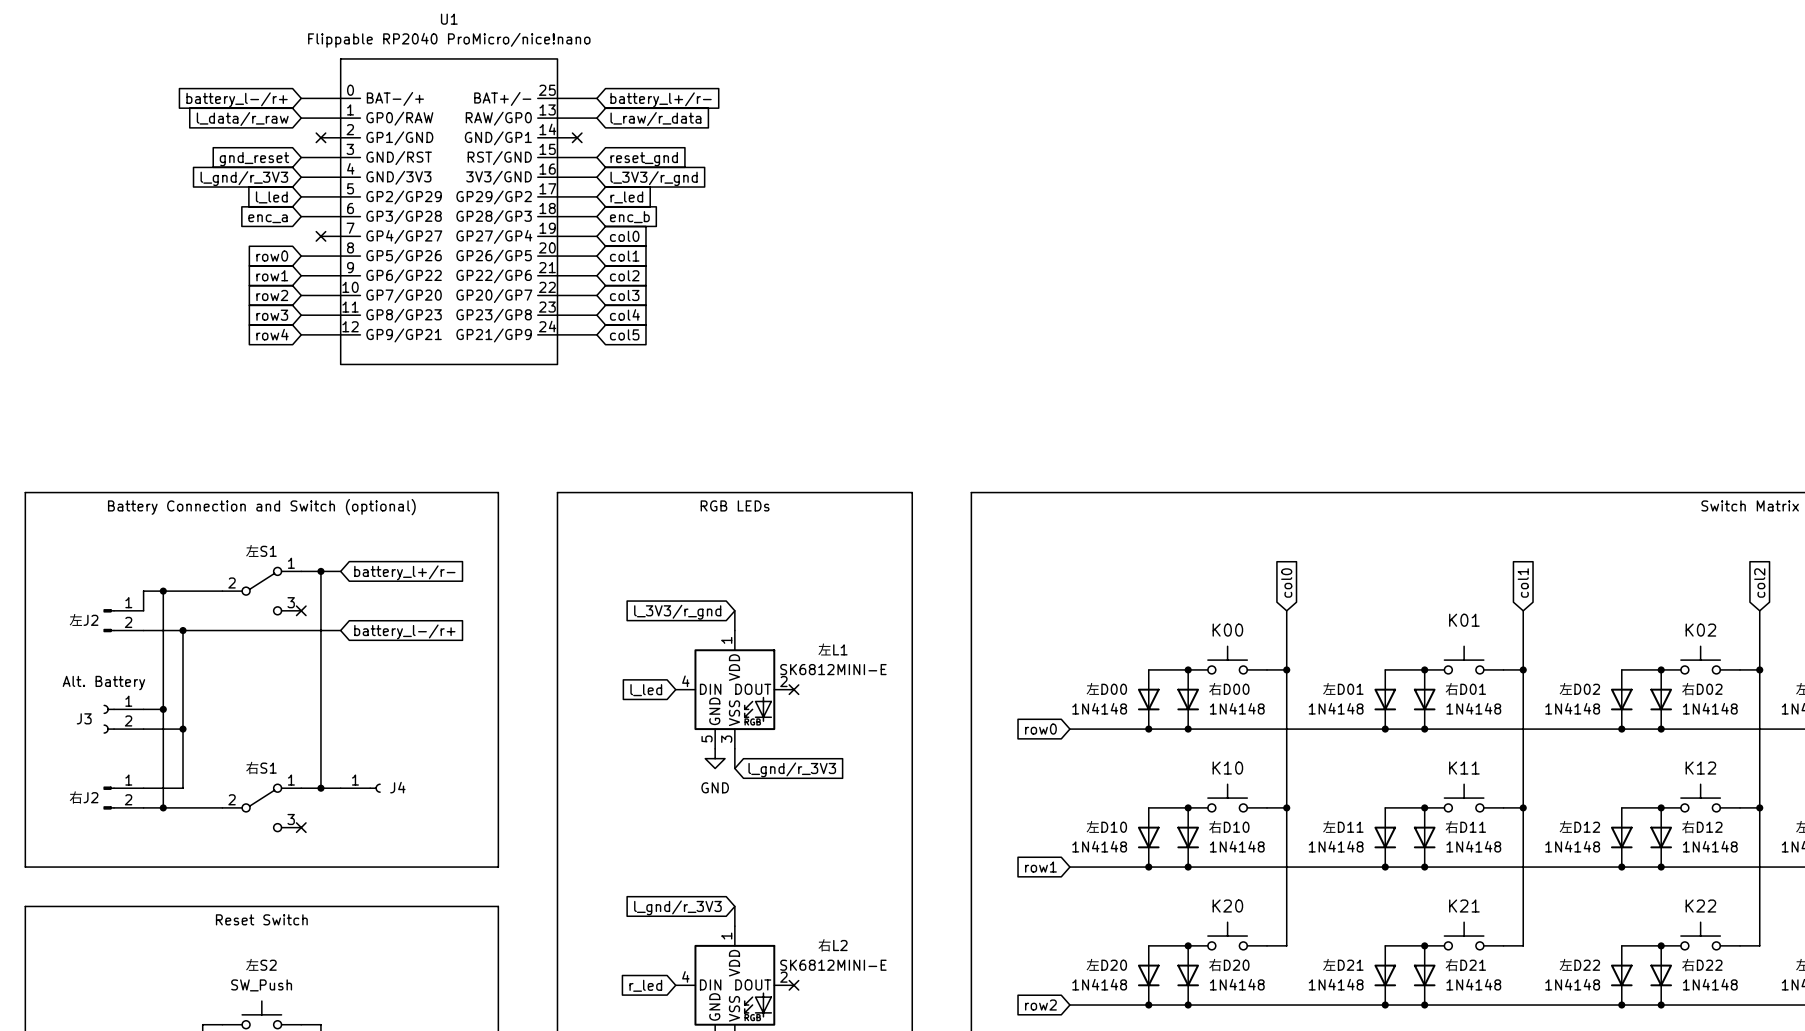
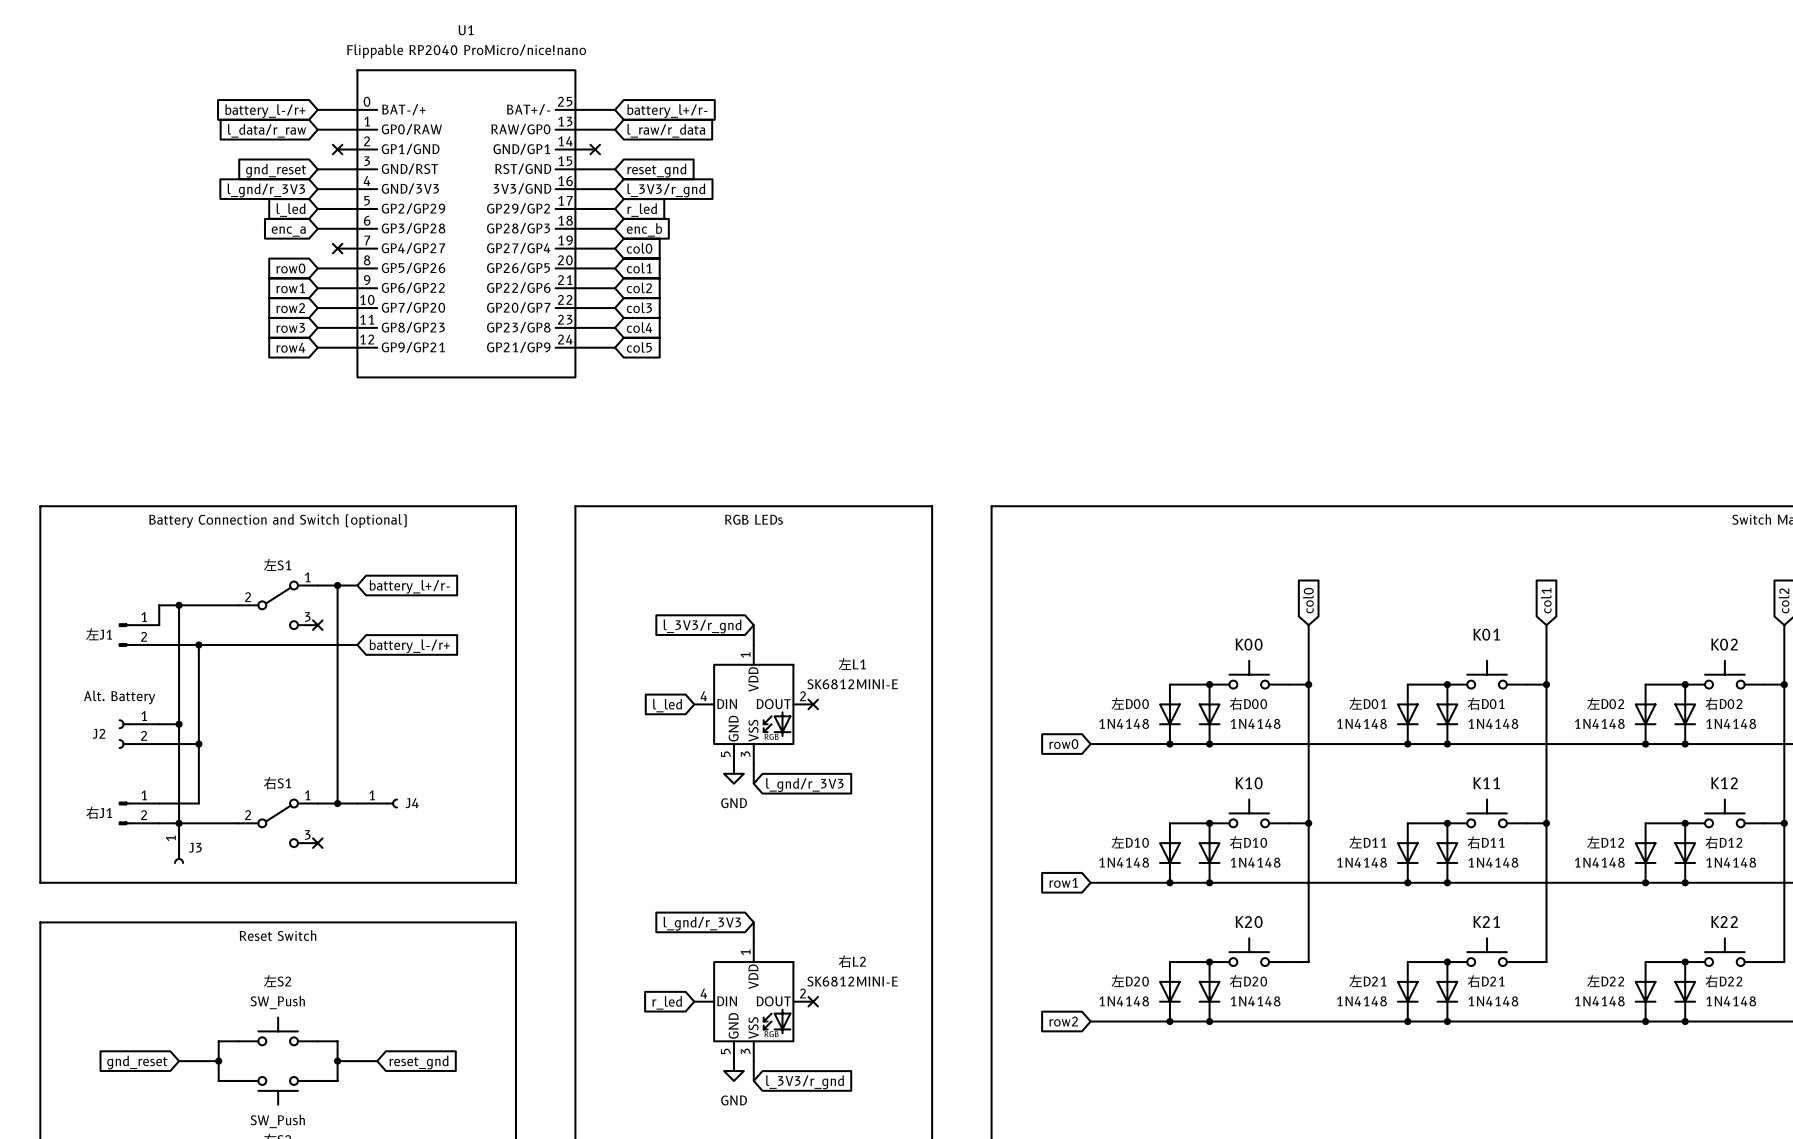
左J2 name: 左J2 (83, 619) -> 左J1 (99, 634)
J3 name: J3 (84, 718) -> J2 (98, 733)
右J2 name: 右J2 (83, 797) -> 右J1 (99, 812)
J3: none -> (179, 843)

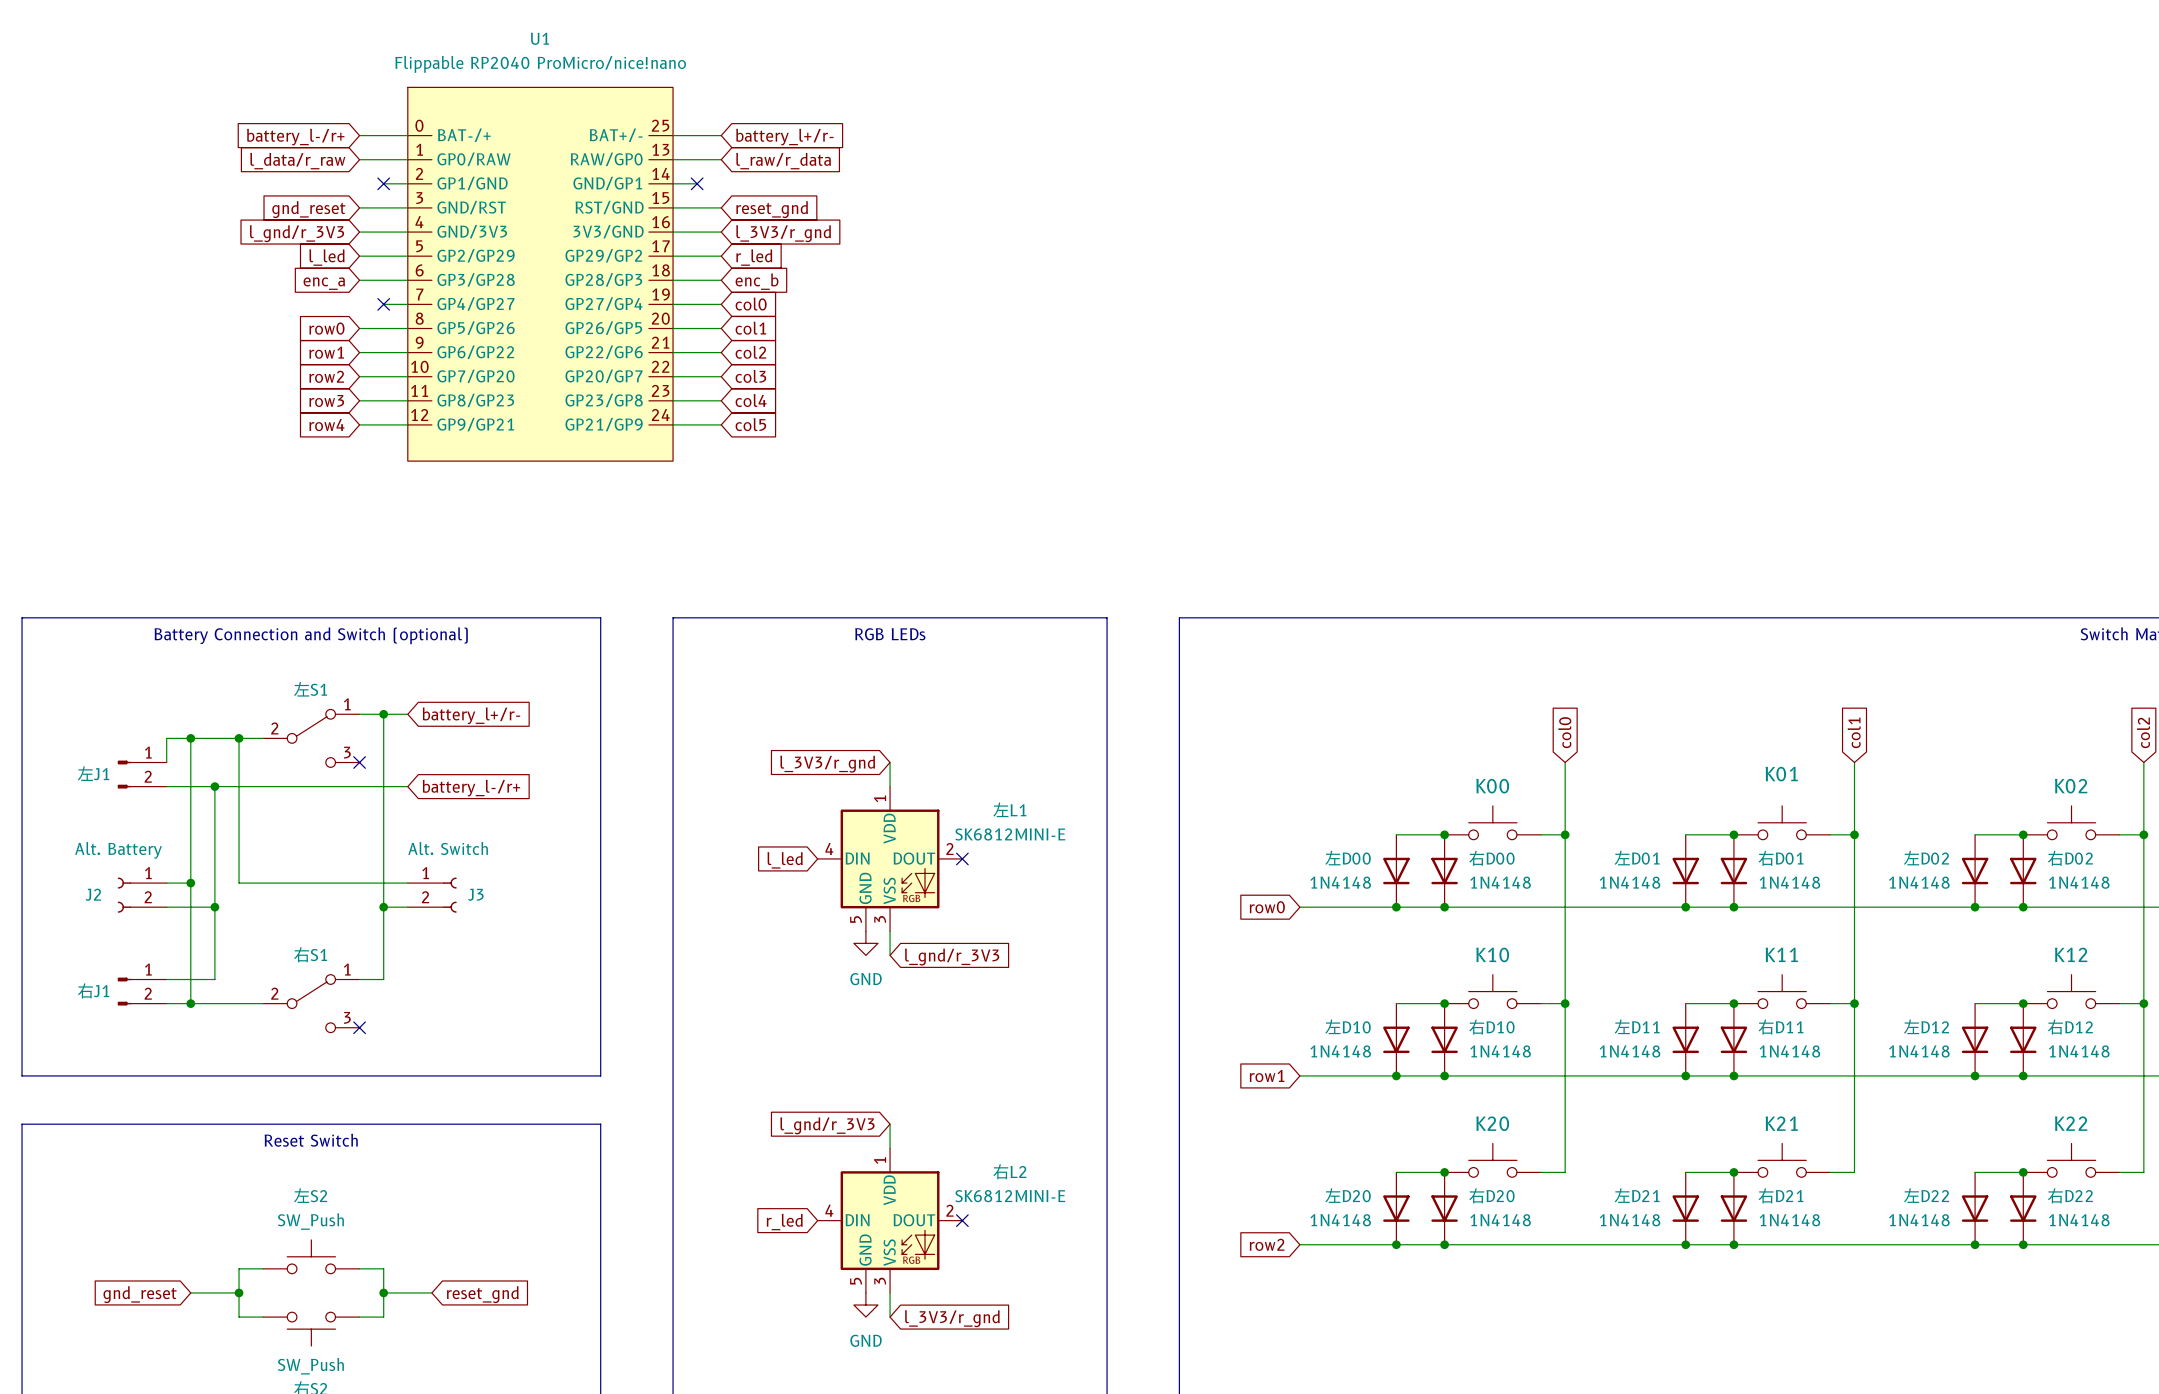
wire: none -> (239, 738) (239, 883) (407, 883)
junction: none -> (239, 738)
J3 value: none -> Alt. Switch (448, 848)
junction: none -> (383, 907)
wire: (337, 803) (357, 803) -> (383, 907) (407, 907)
junction: (337, 803) -> none
J4: (377, 803) -> none
J3 symbol: [174, 823, 184, 864] -> [407, 877, 457, 913]
J3 name position: J3 (195, 847) -> J3 (475, 894)

